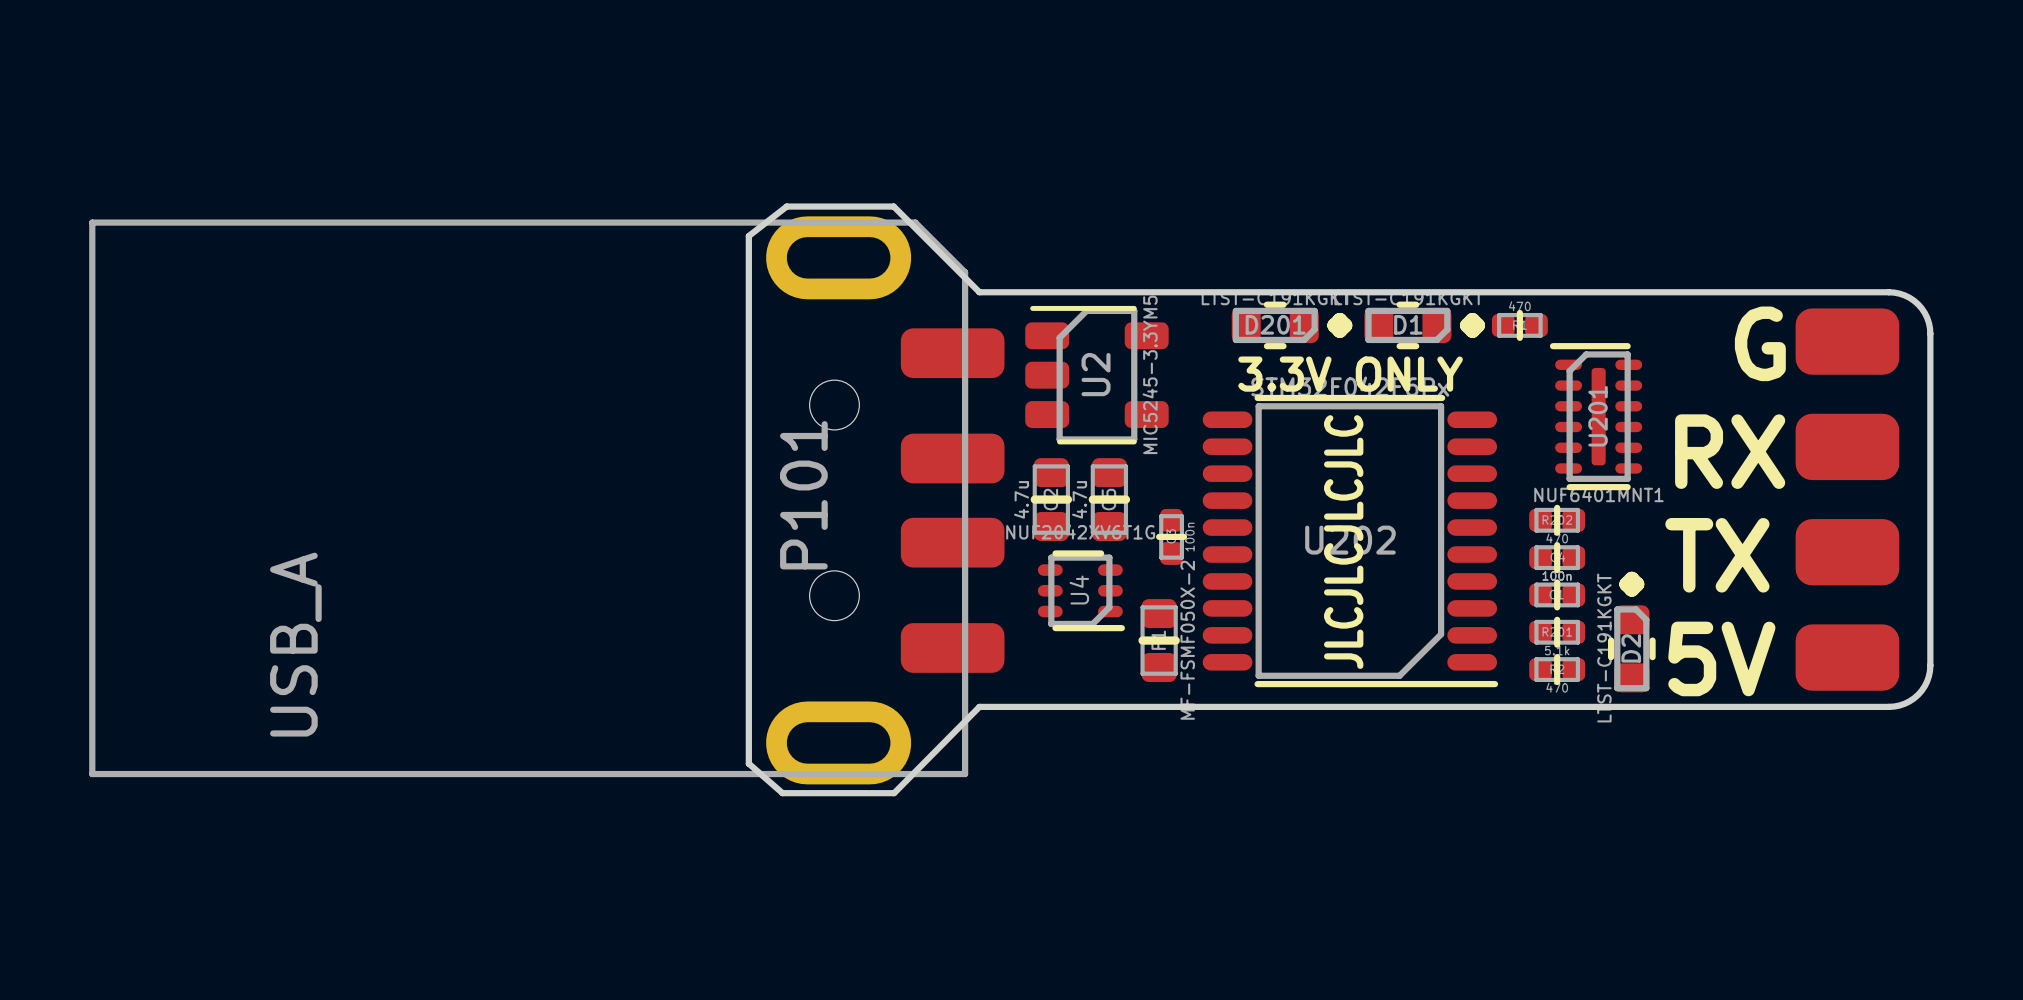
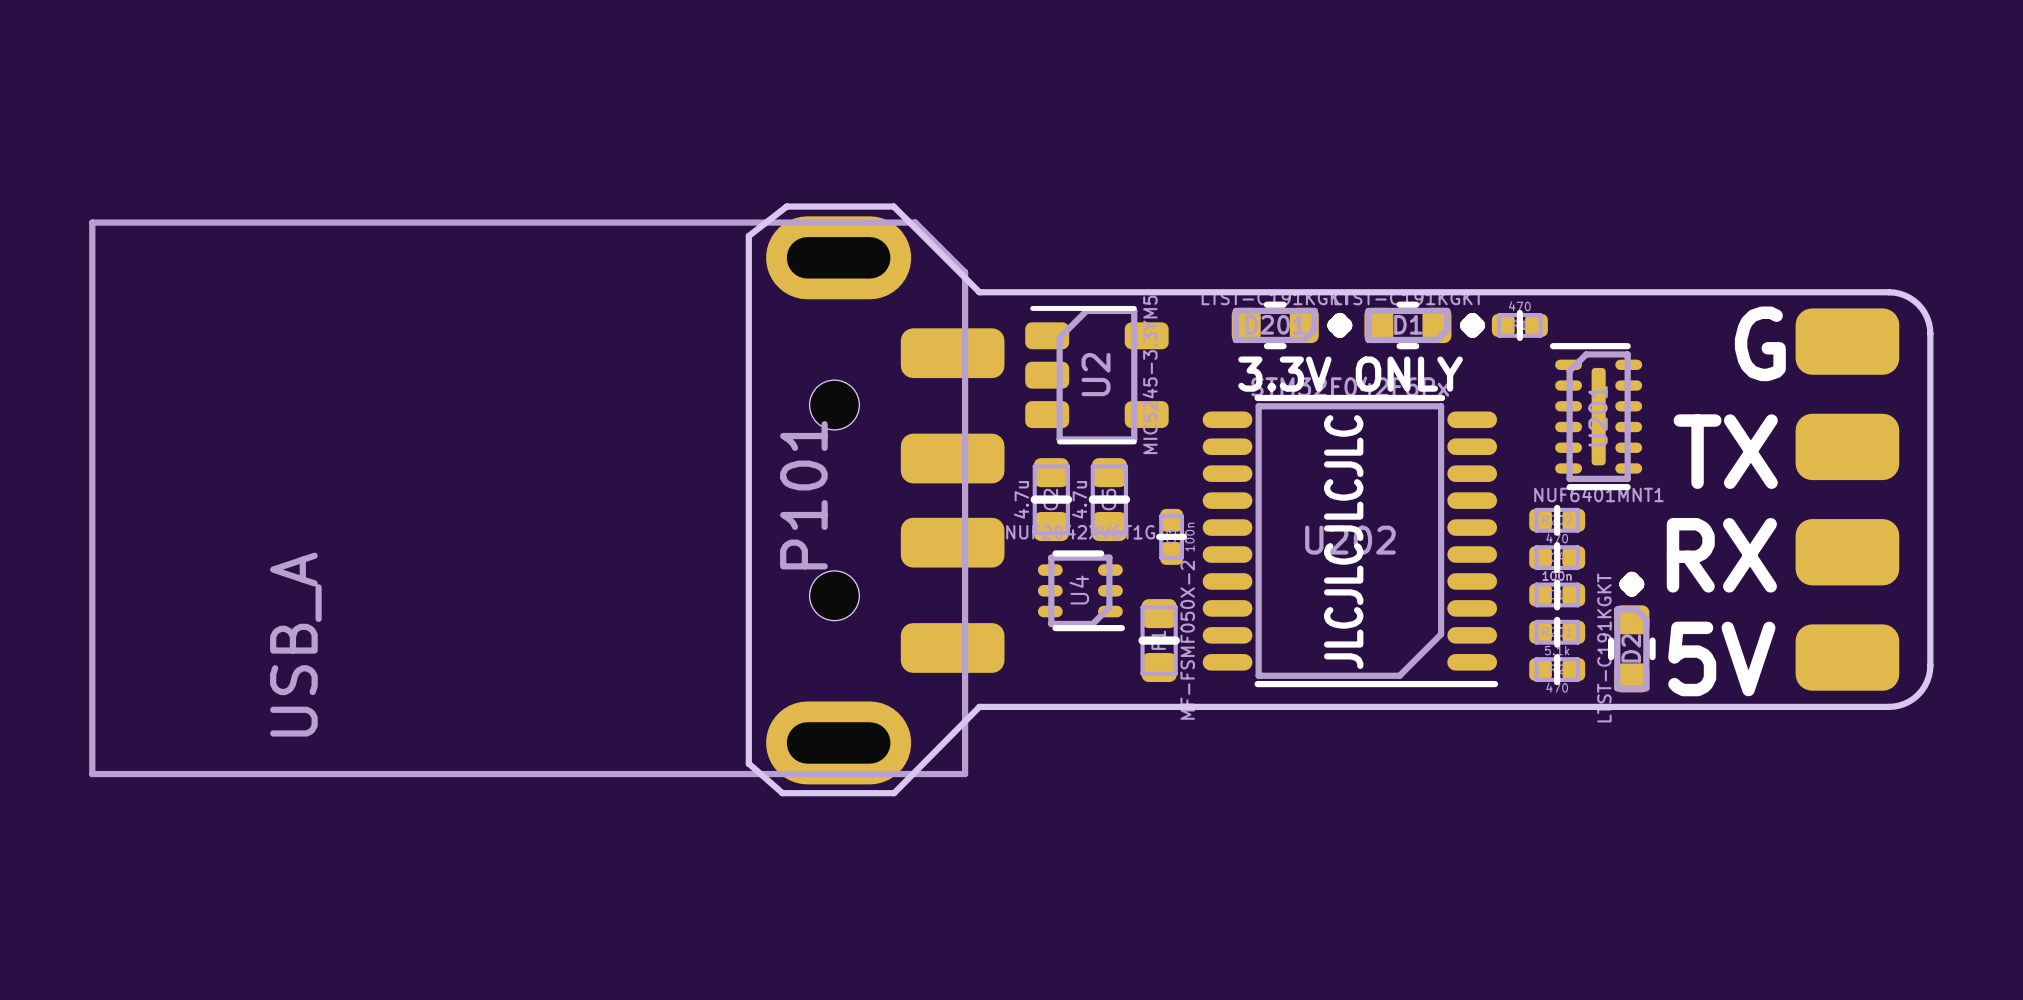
text: RX (1730, 451) -> TX (1725, 451)
text: TX (1717, 555) -> RX (1721, 555)

